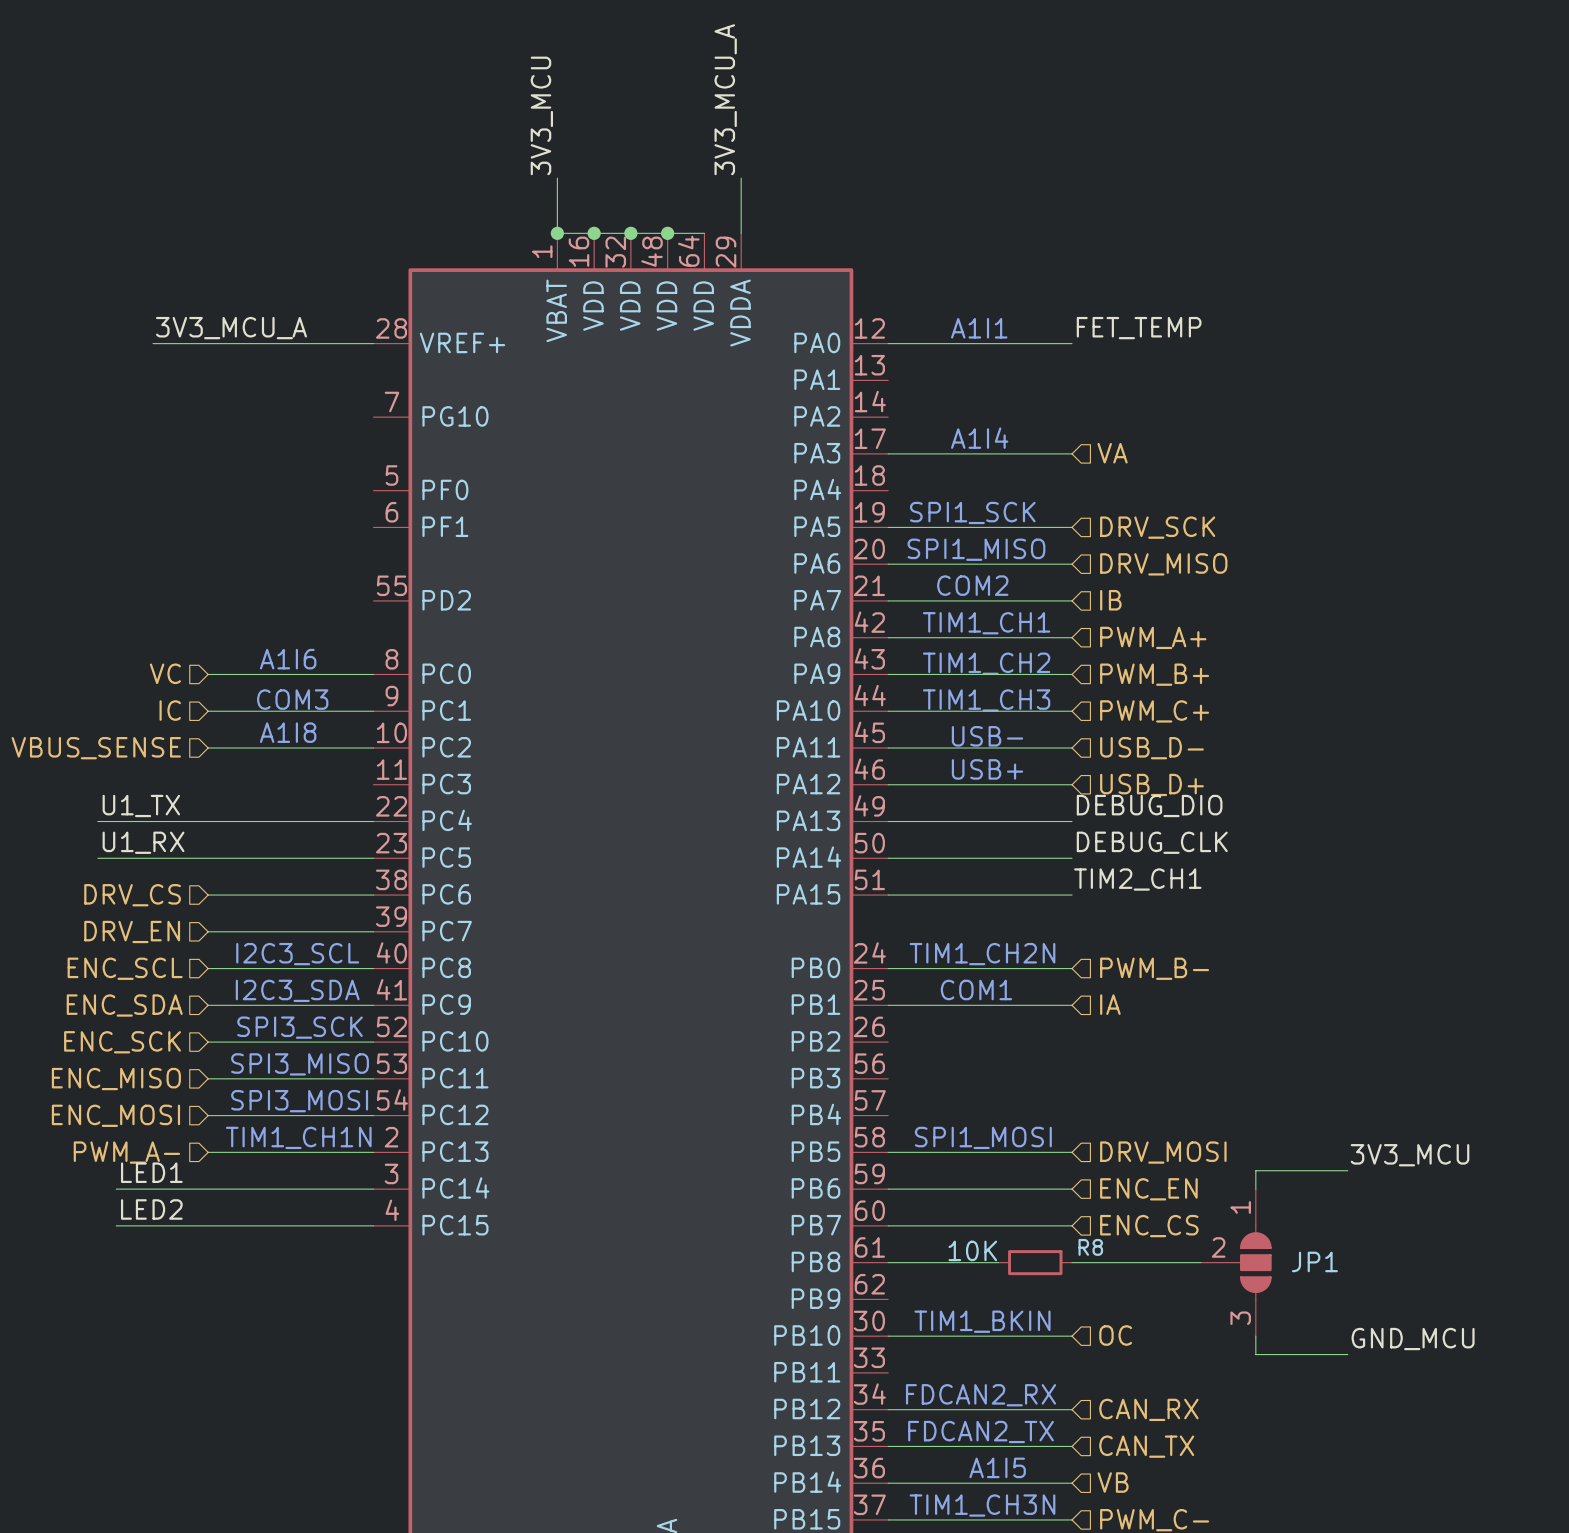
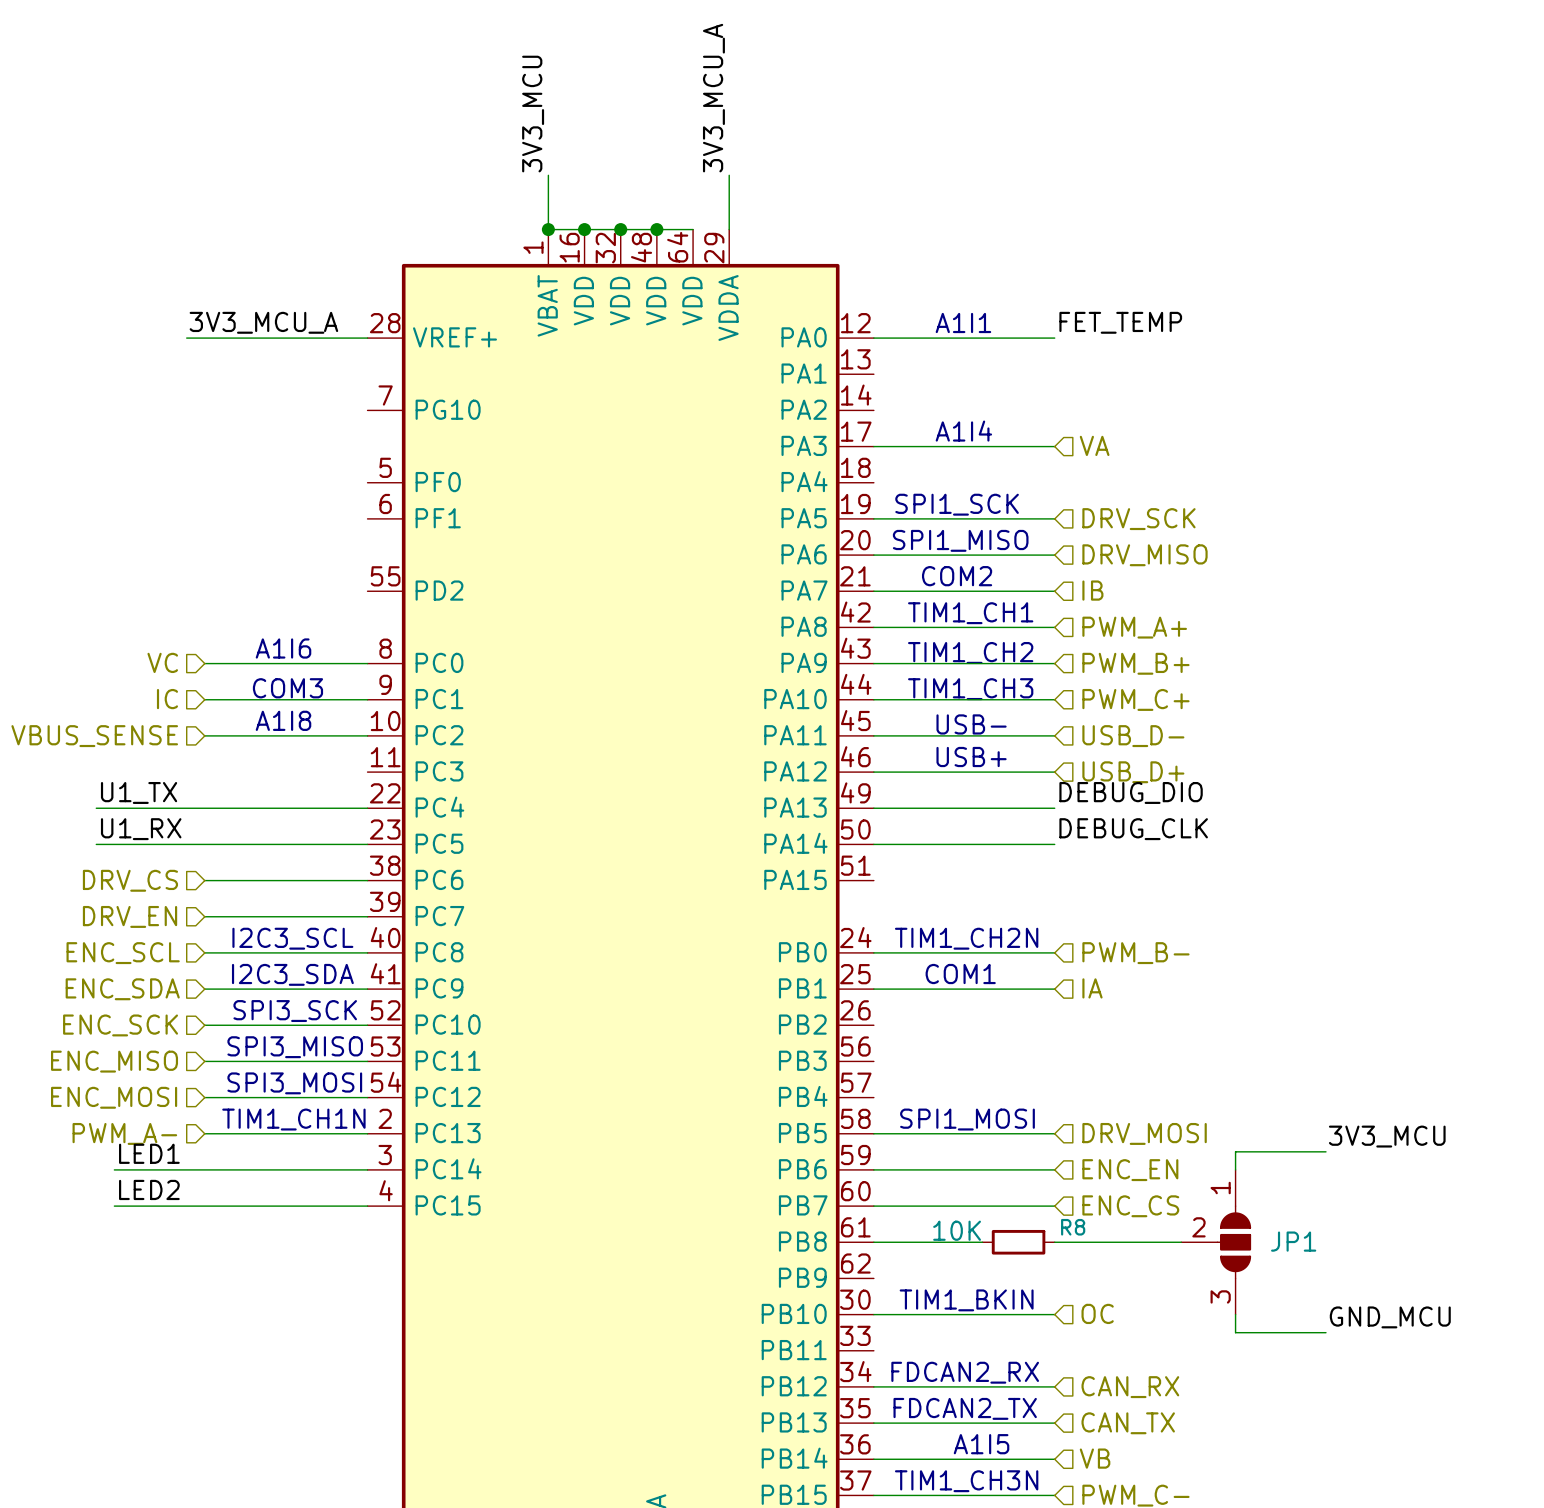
label position: 3V3_MCU_A (231, 328) -> 3V3_MCU_A (263, 322)
wire: (153, 343) (189, 343) -> none
label: TIM2_CH1 (1137, 879) -> none
wire: (888, 895) (1072, 895) -> none

